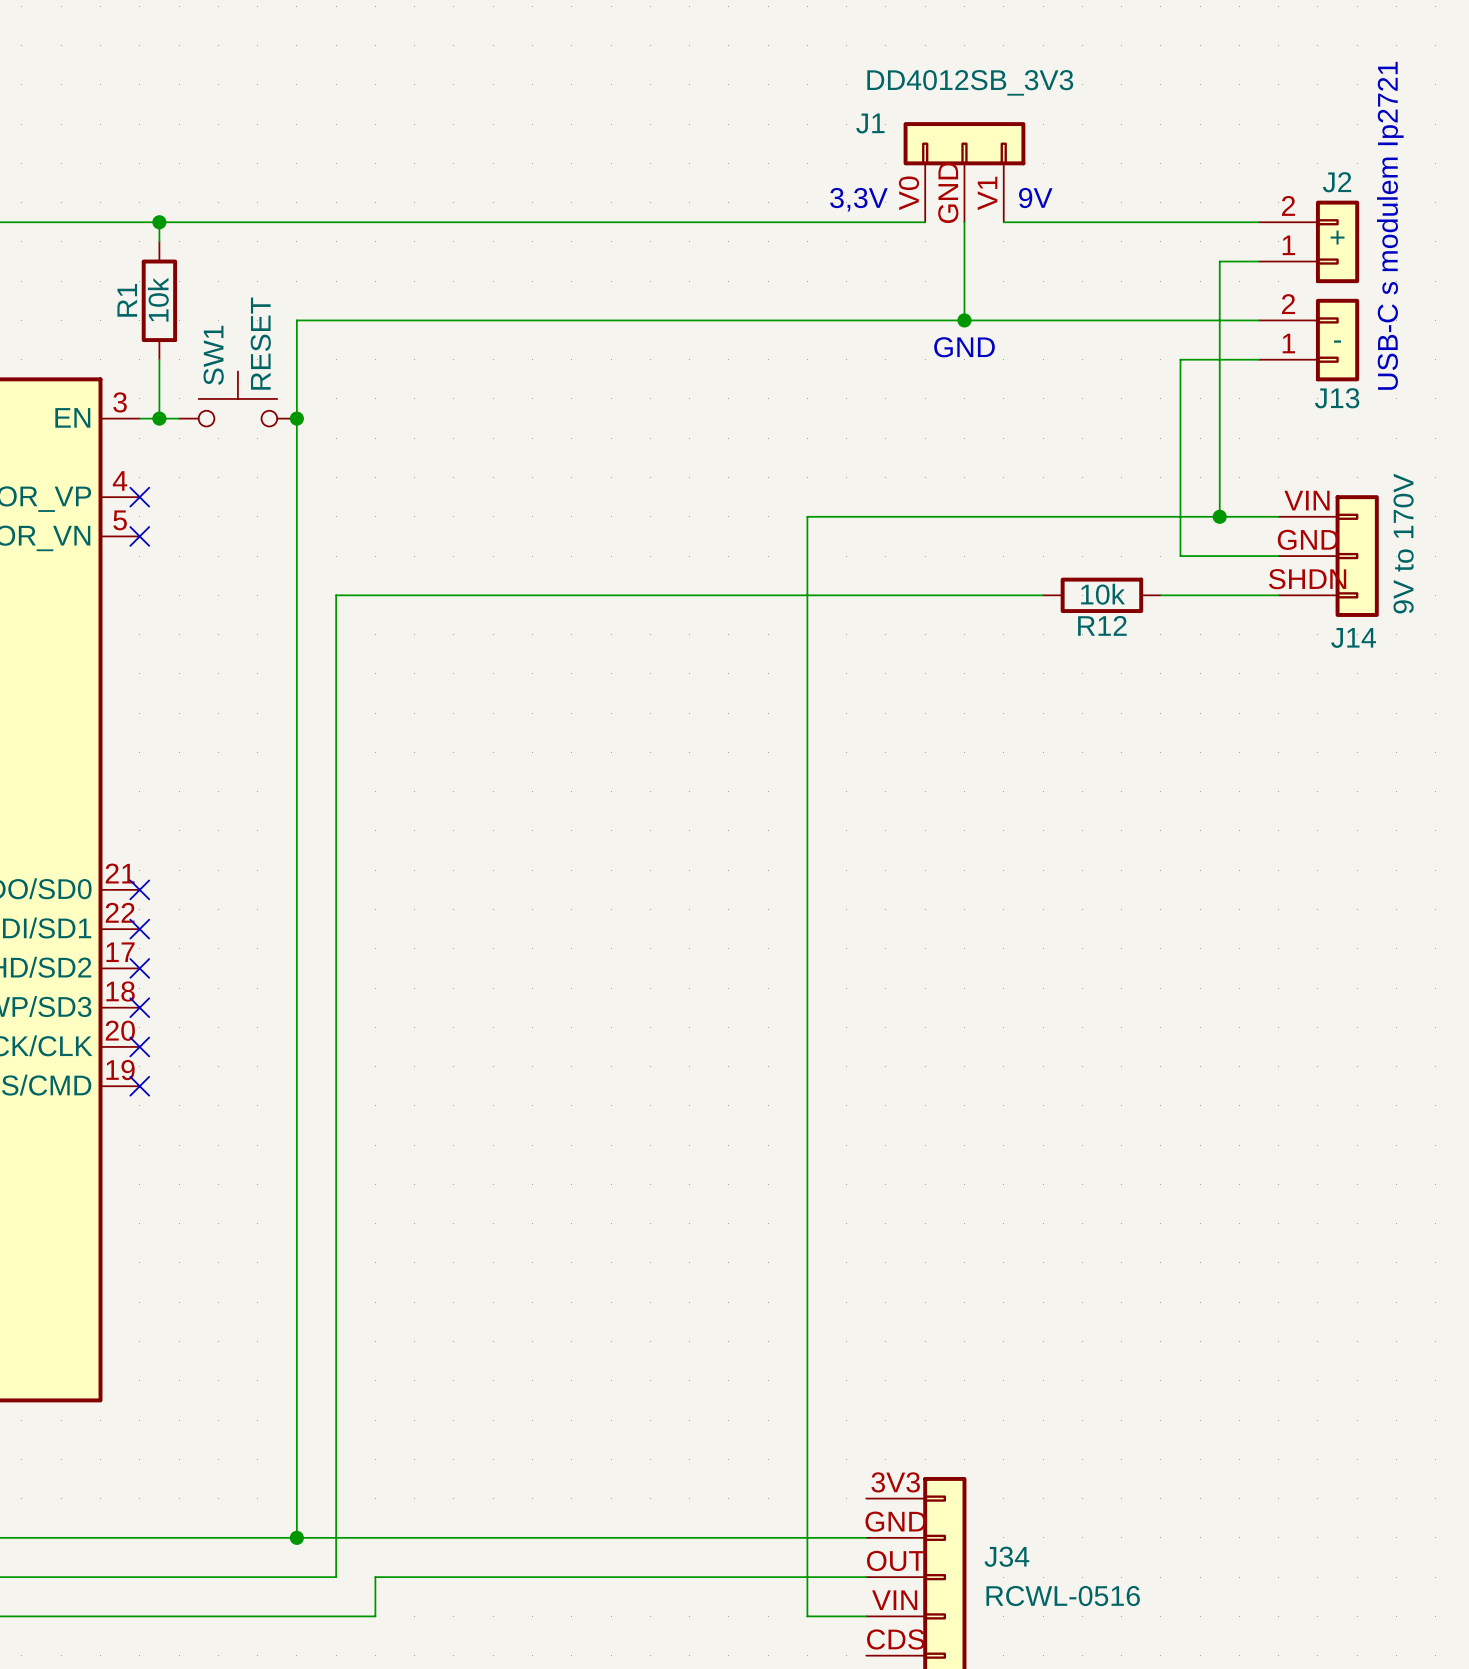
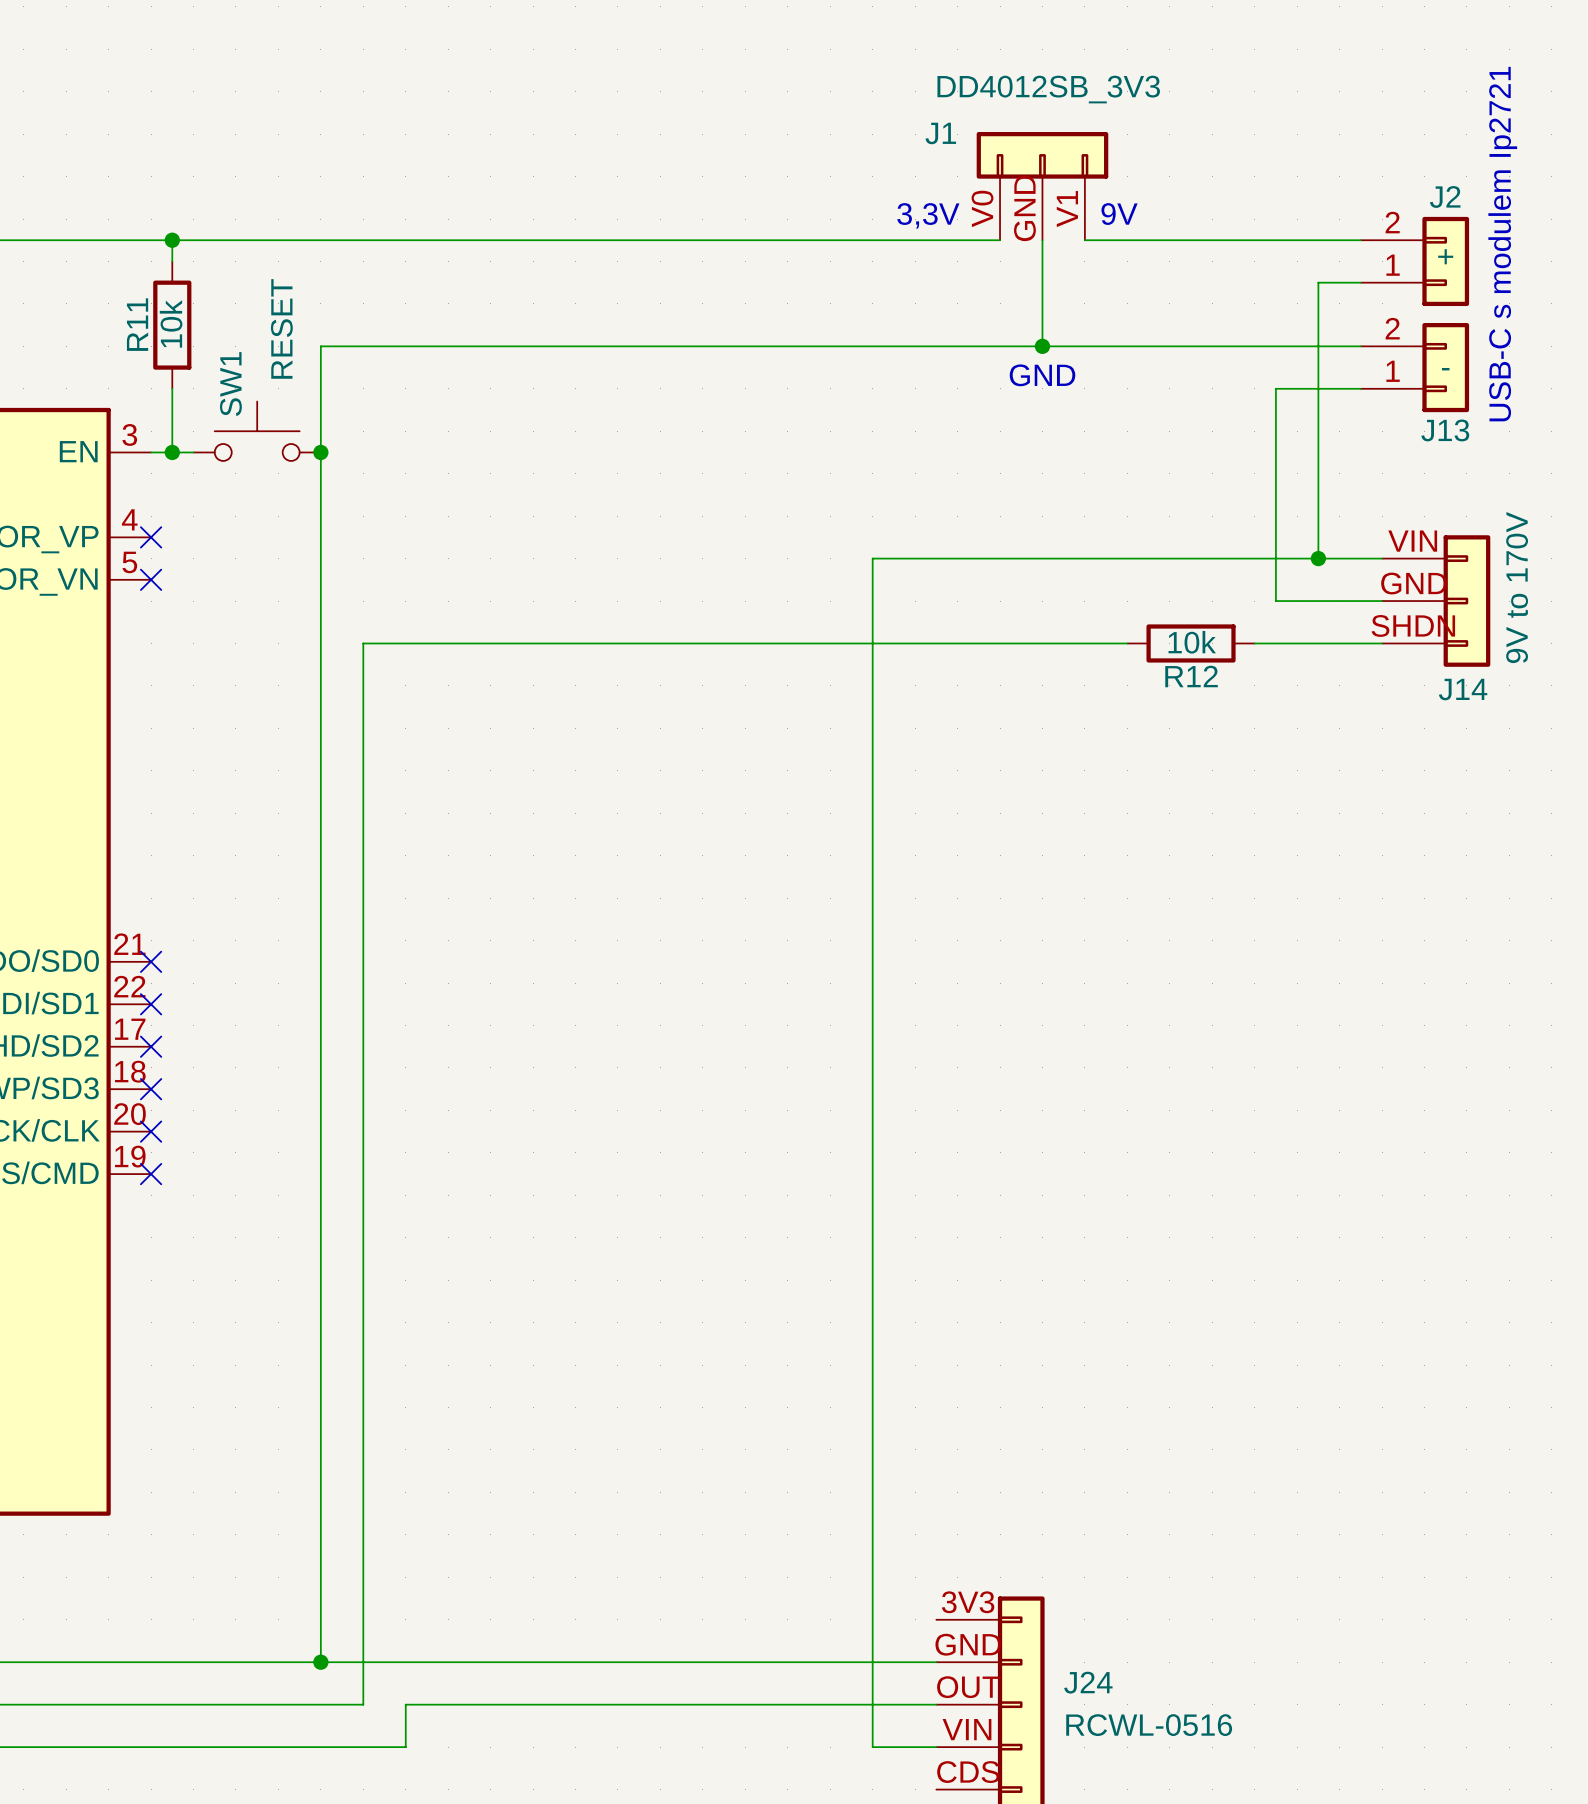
R1 name: R1 (127, 300) -> R11 (137, 324)
SW1 value position: RESET (260, 343) -> RESET (281, 328)
J34 name: J34 (1006, 1556) -> J24 (1088, 1682)

